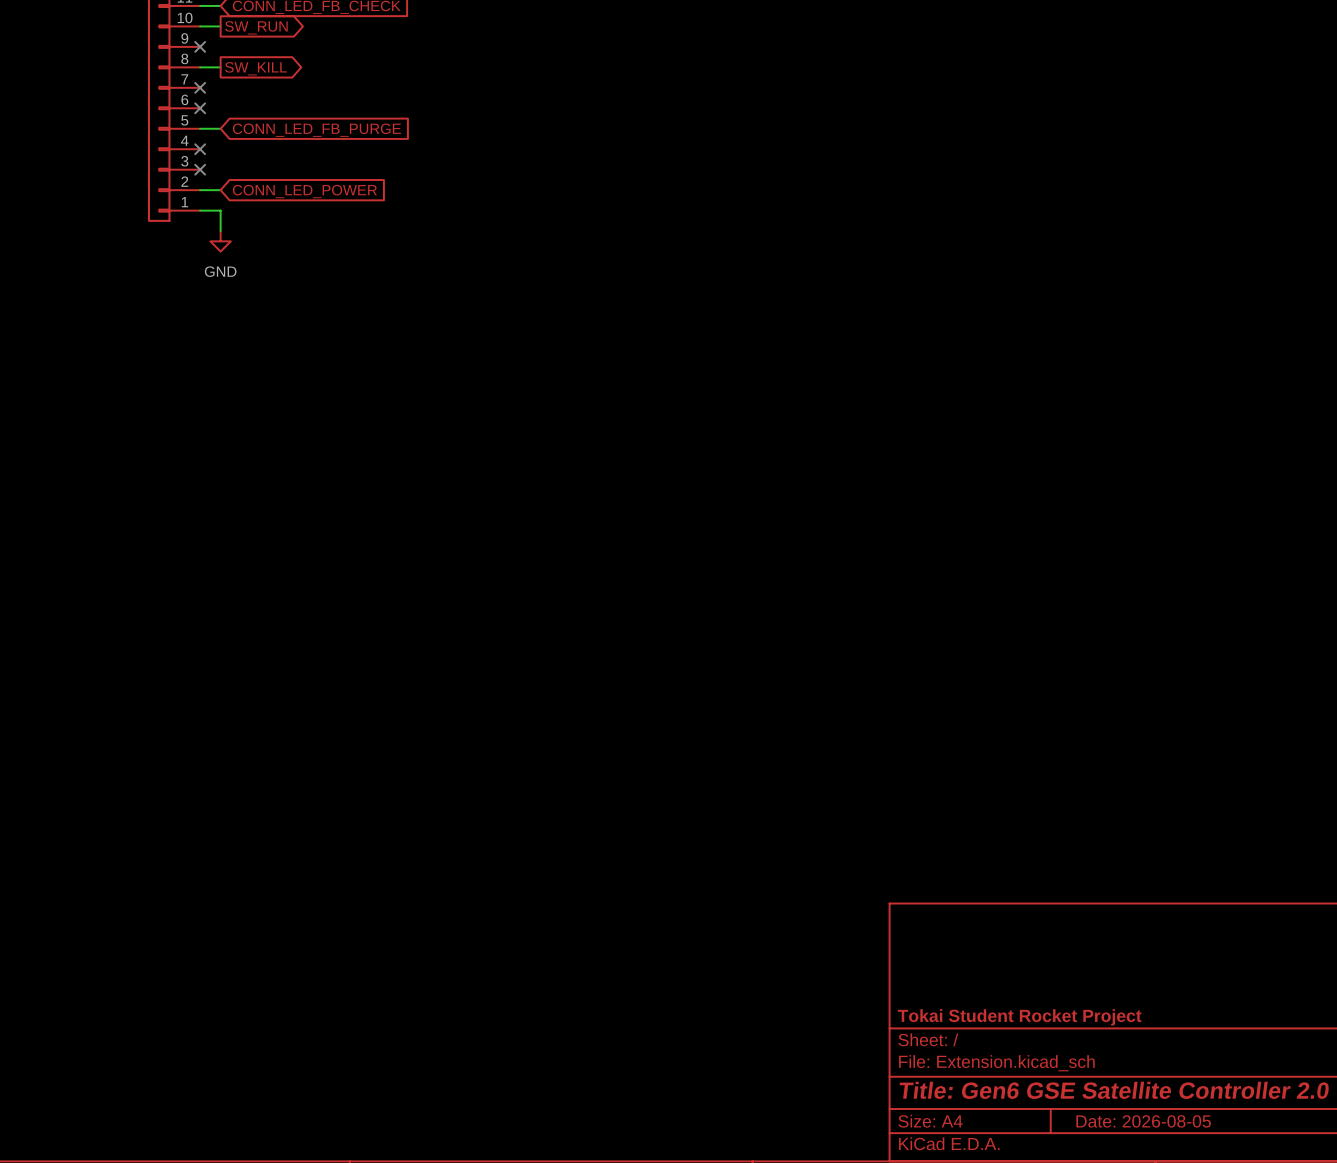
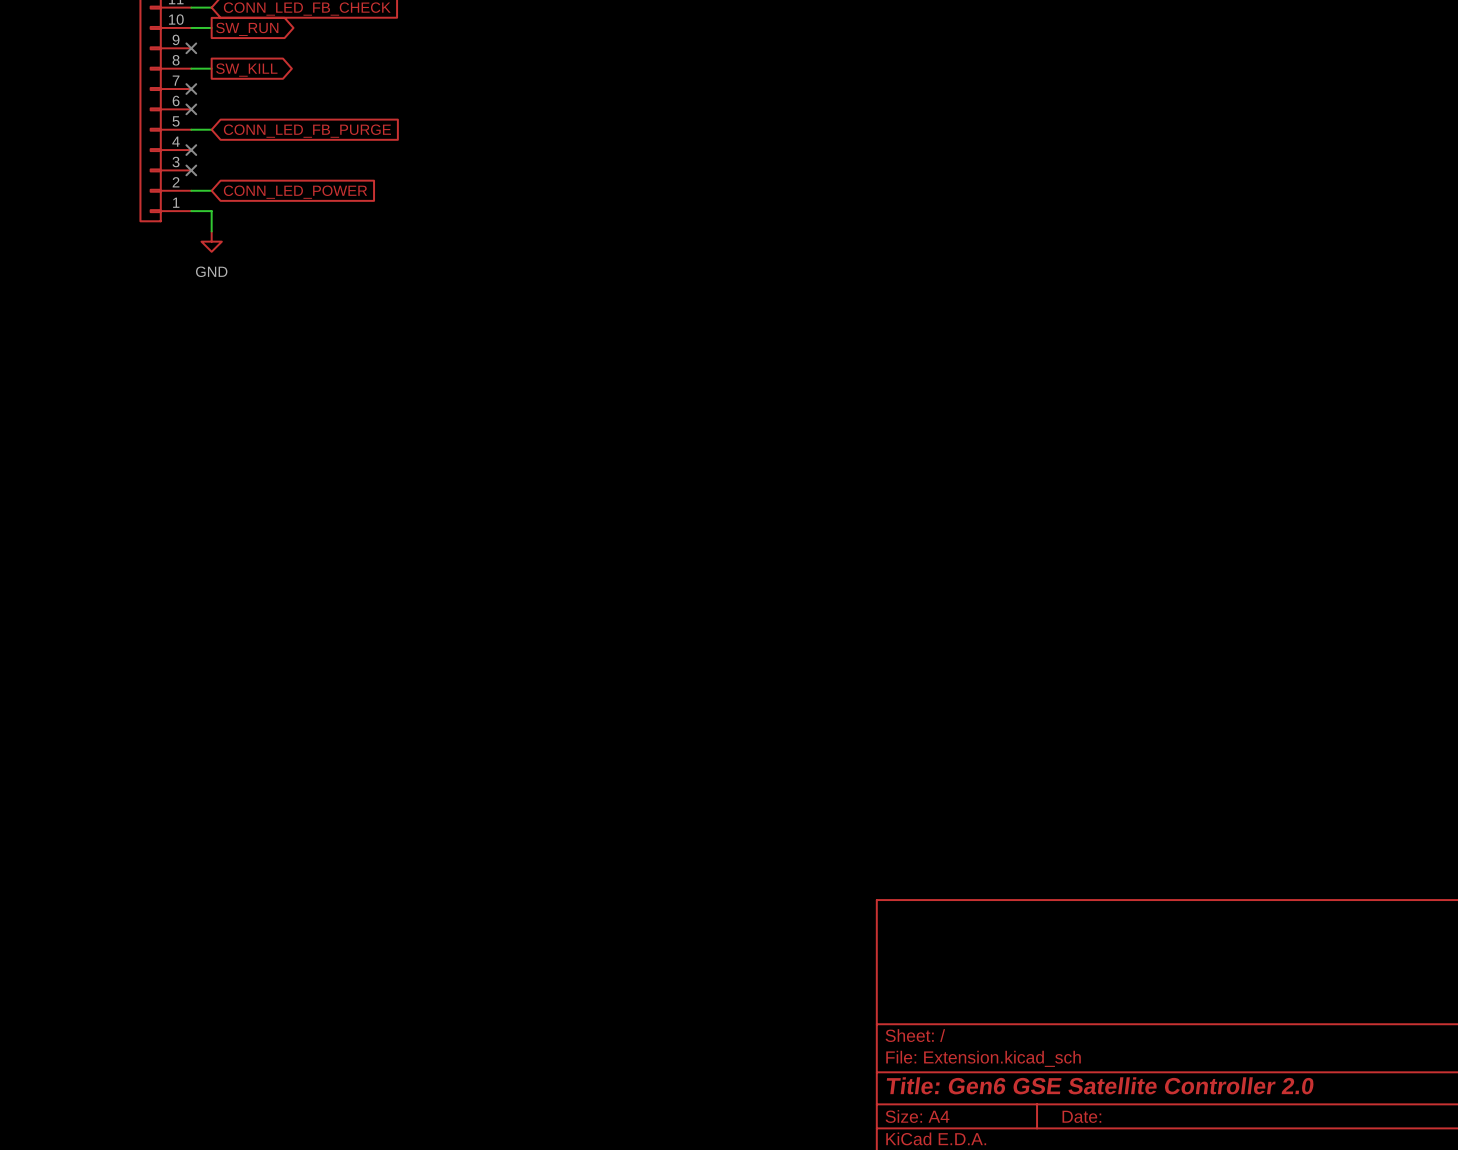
title block: Tokai Student Rocket Project (1019, 1017) -> none
title block: Date: 2026-08-05 (1143, 1121) -> Date: (1081, 1116)

